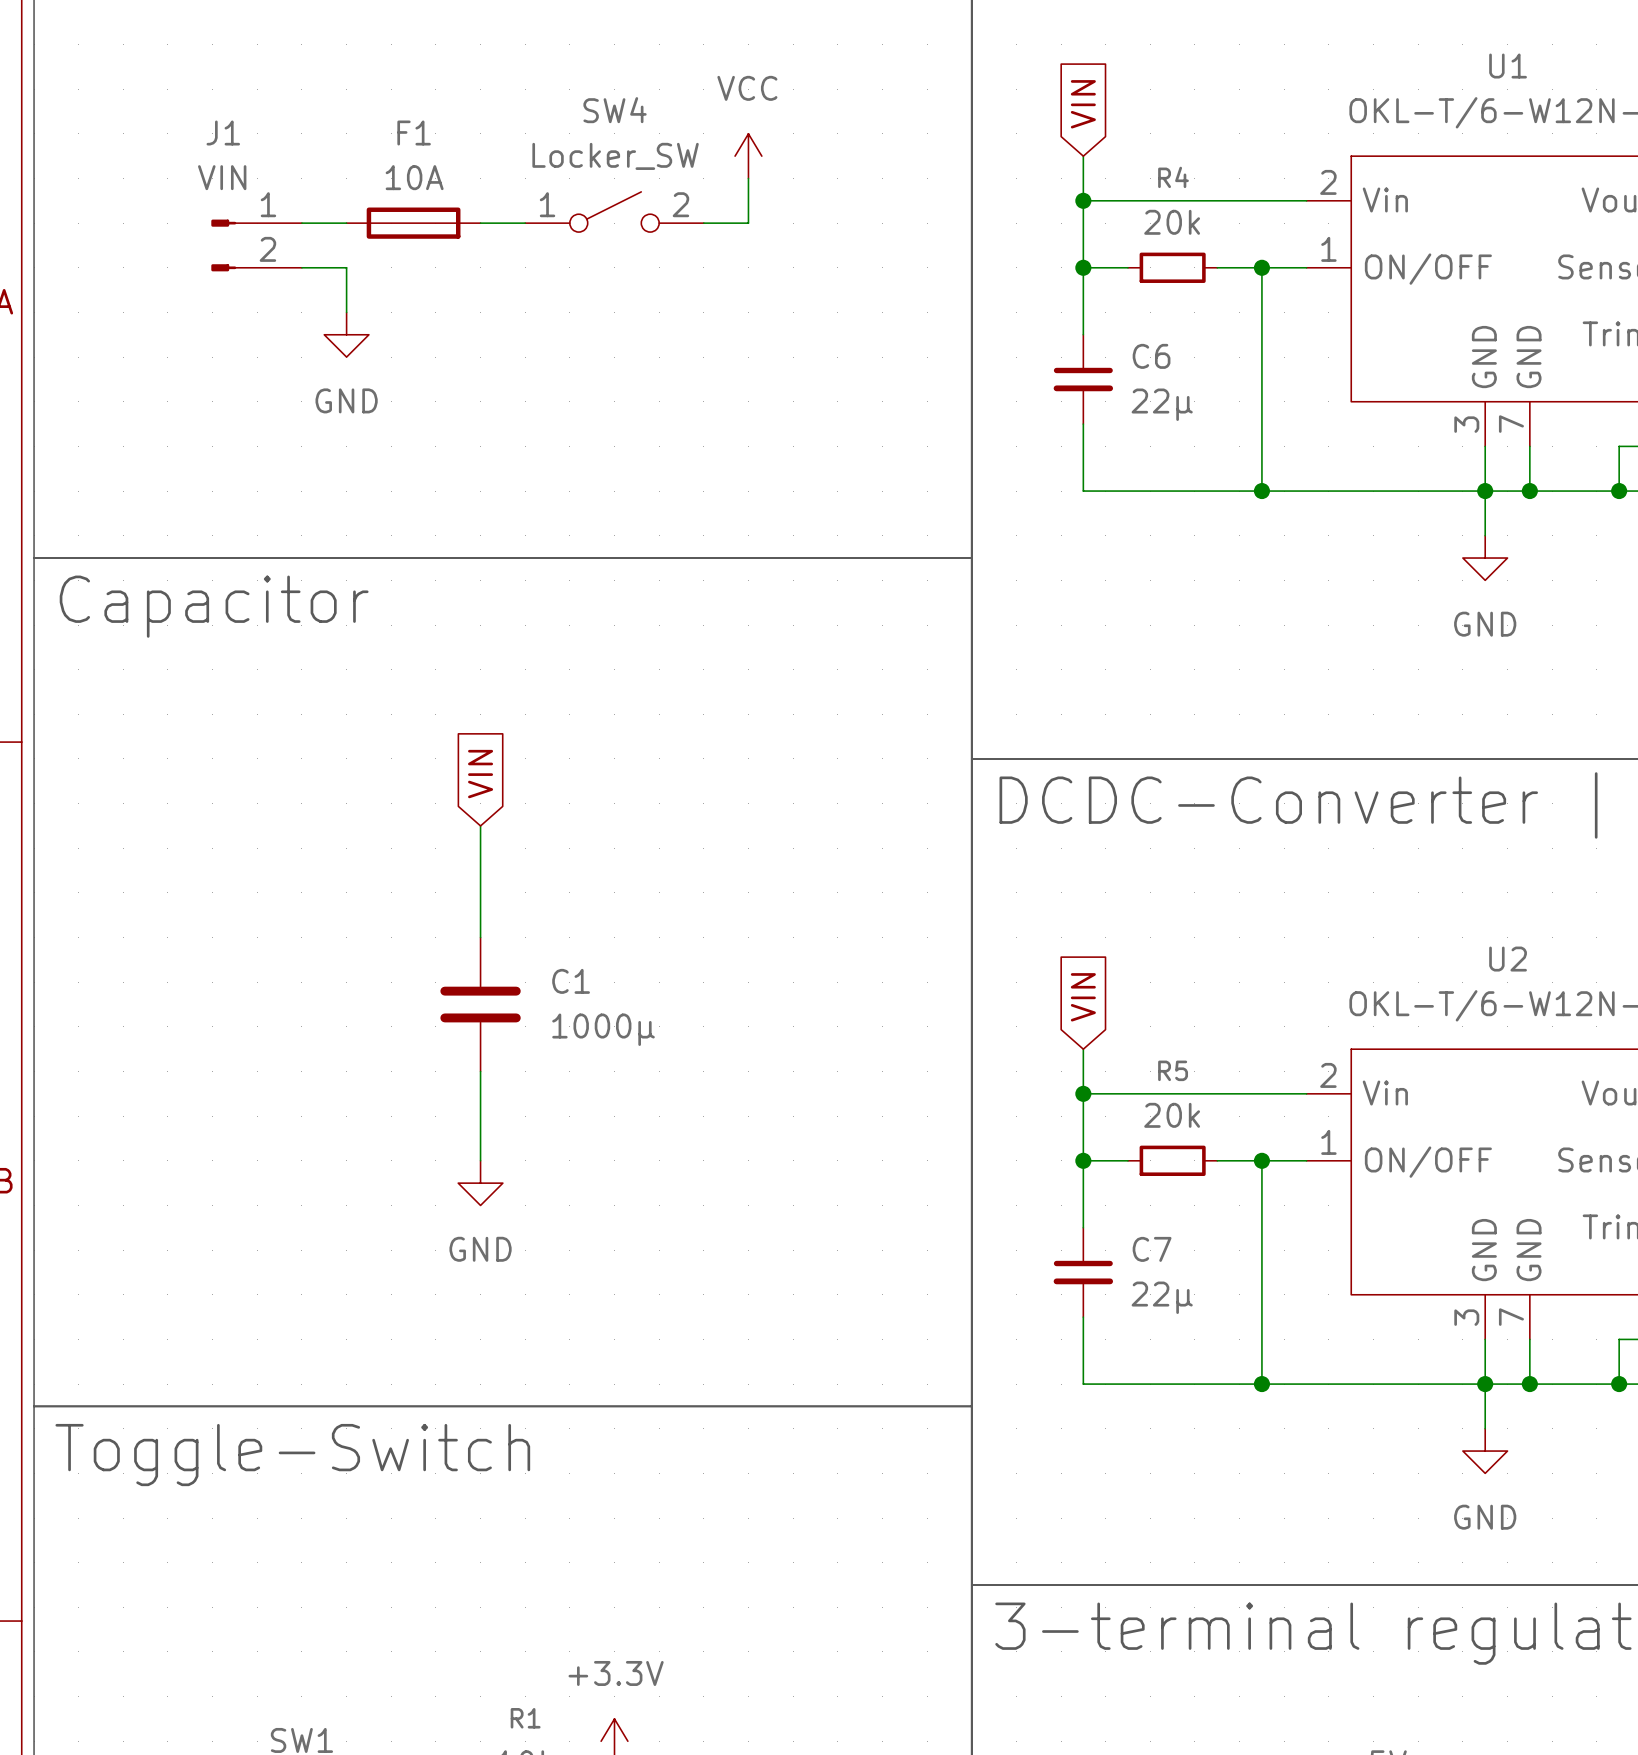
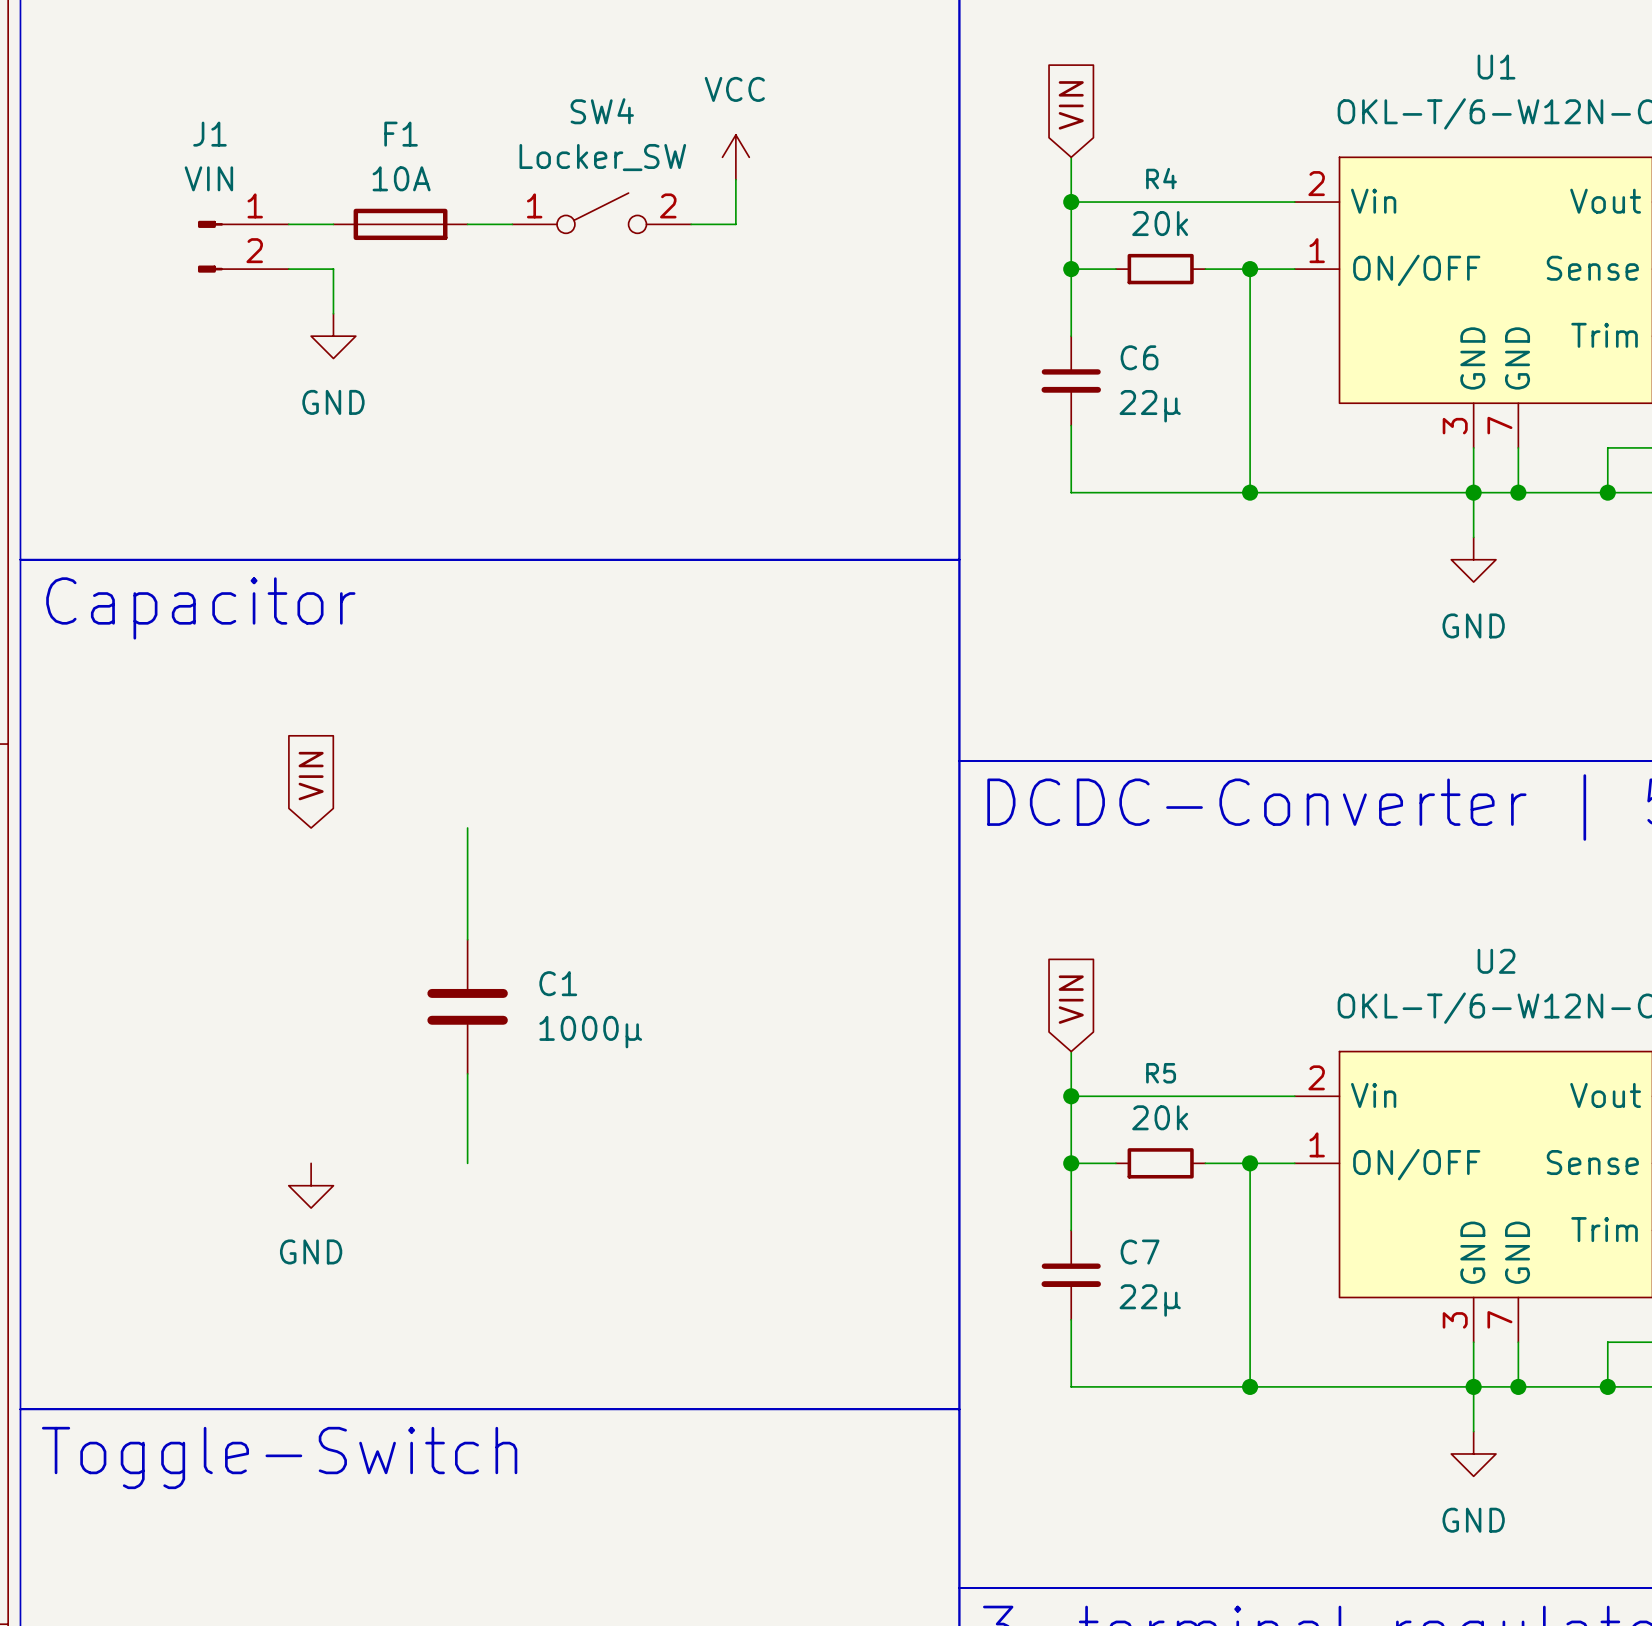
global label position: VIN (480, 774) -> VIN (311, 776)
power symbol position: GND (480, 1183) -> GND (311, 1185)

